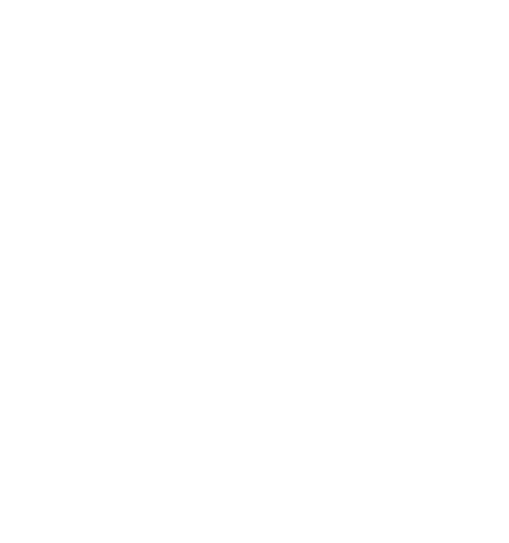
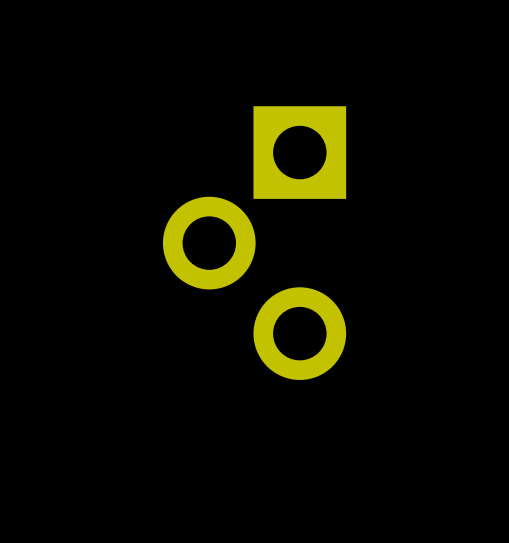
part: none -> (254, 243)

